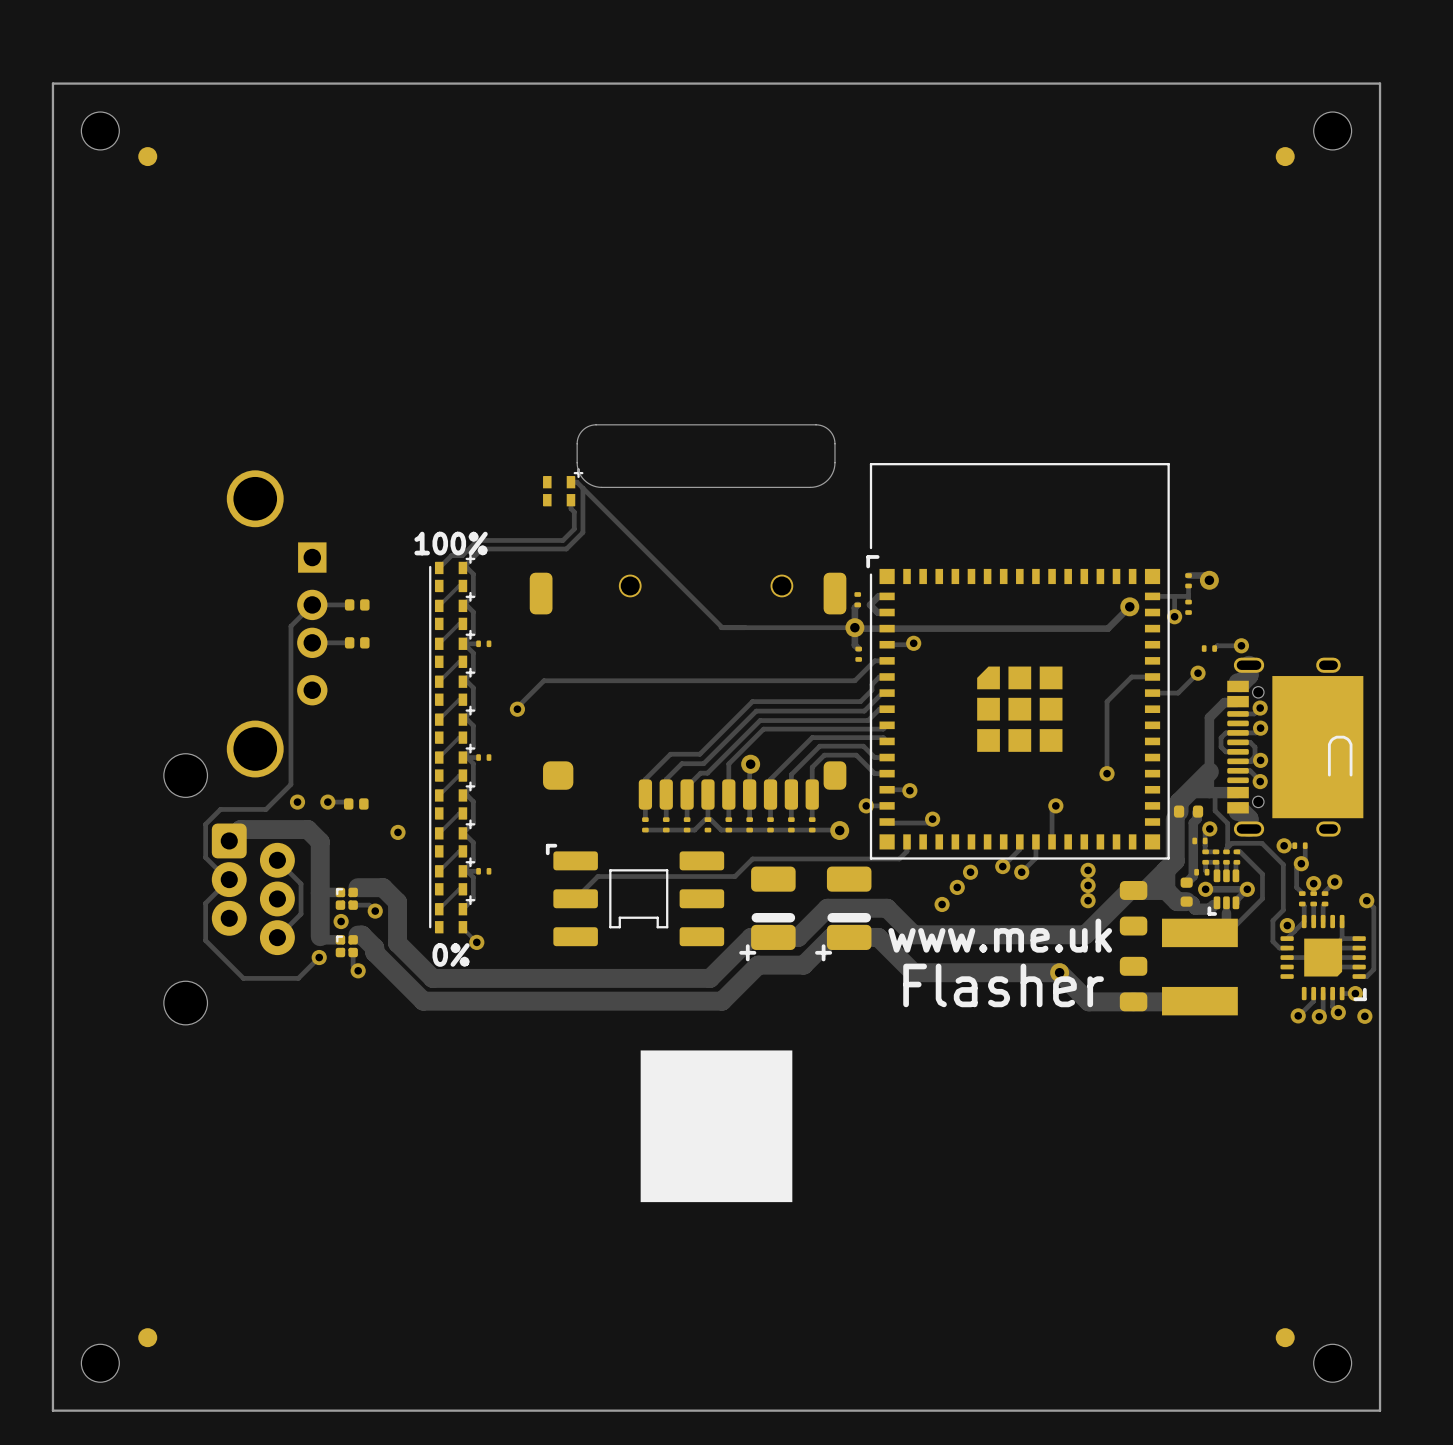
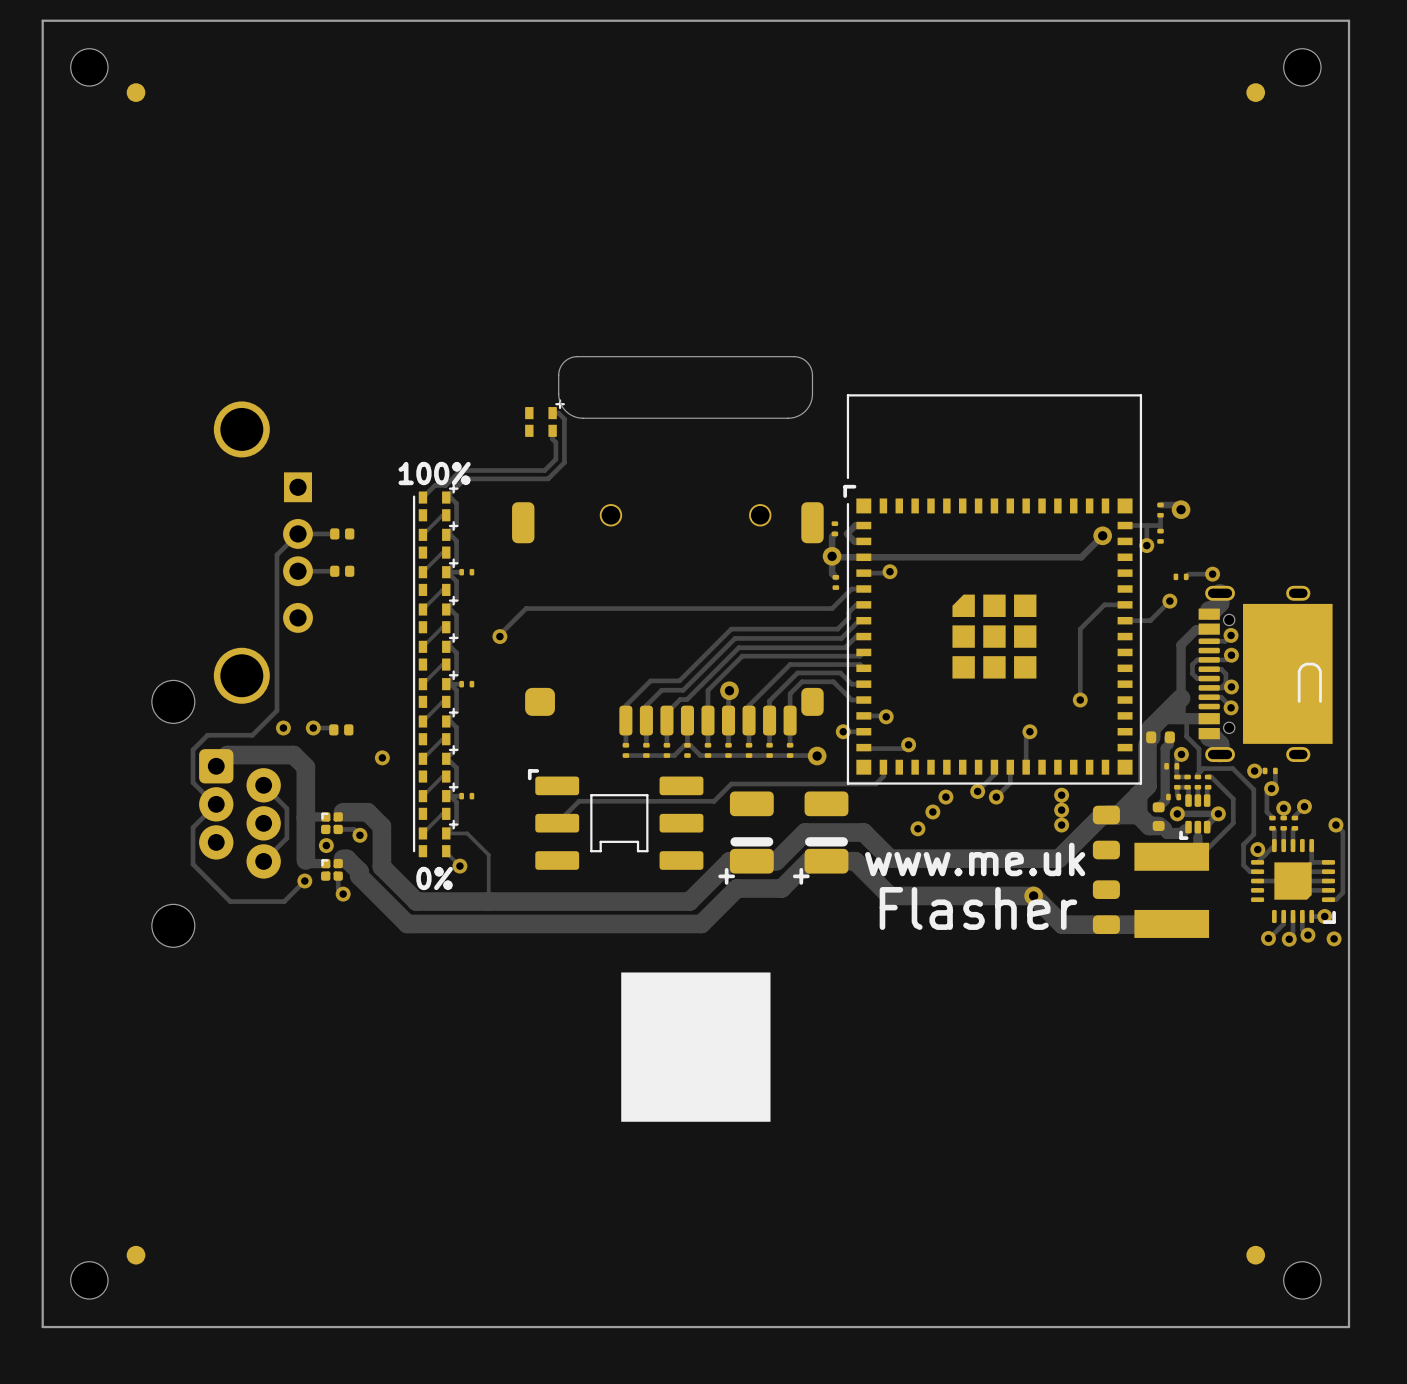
track: (582, 488) (722, 627) -> none
track: (721, 627) (854, 627) -> none
track: none -> (446, 833) (467, 833) (488, 854) (488, 901)

